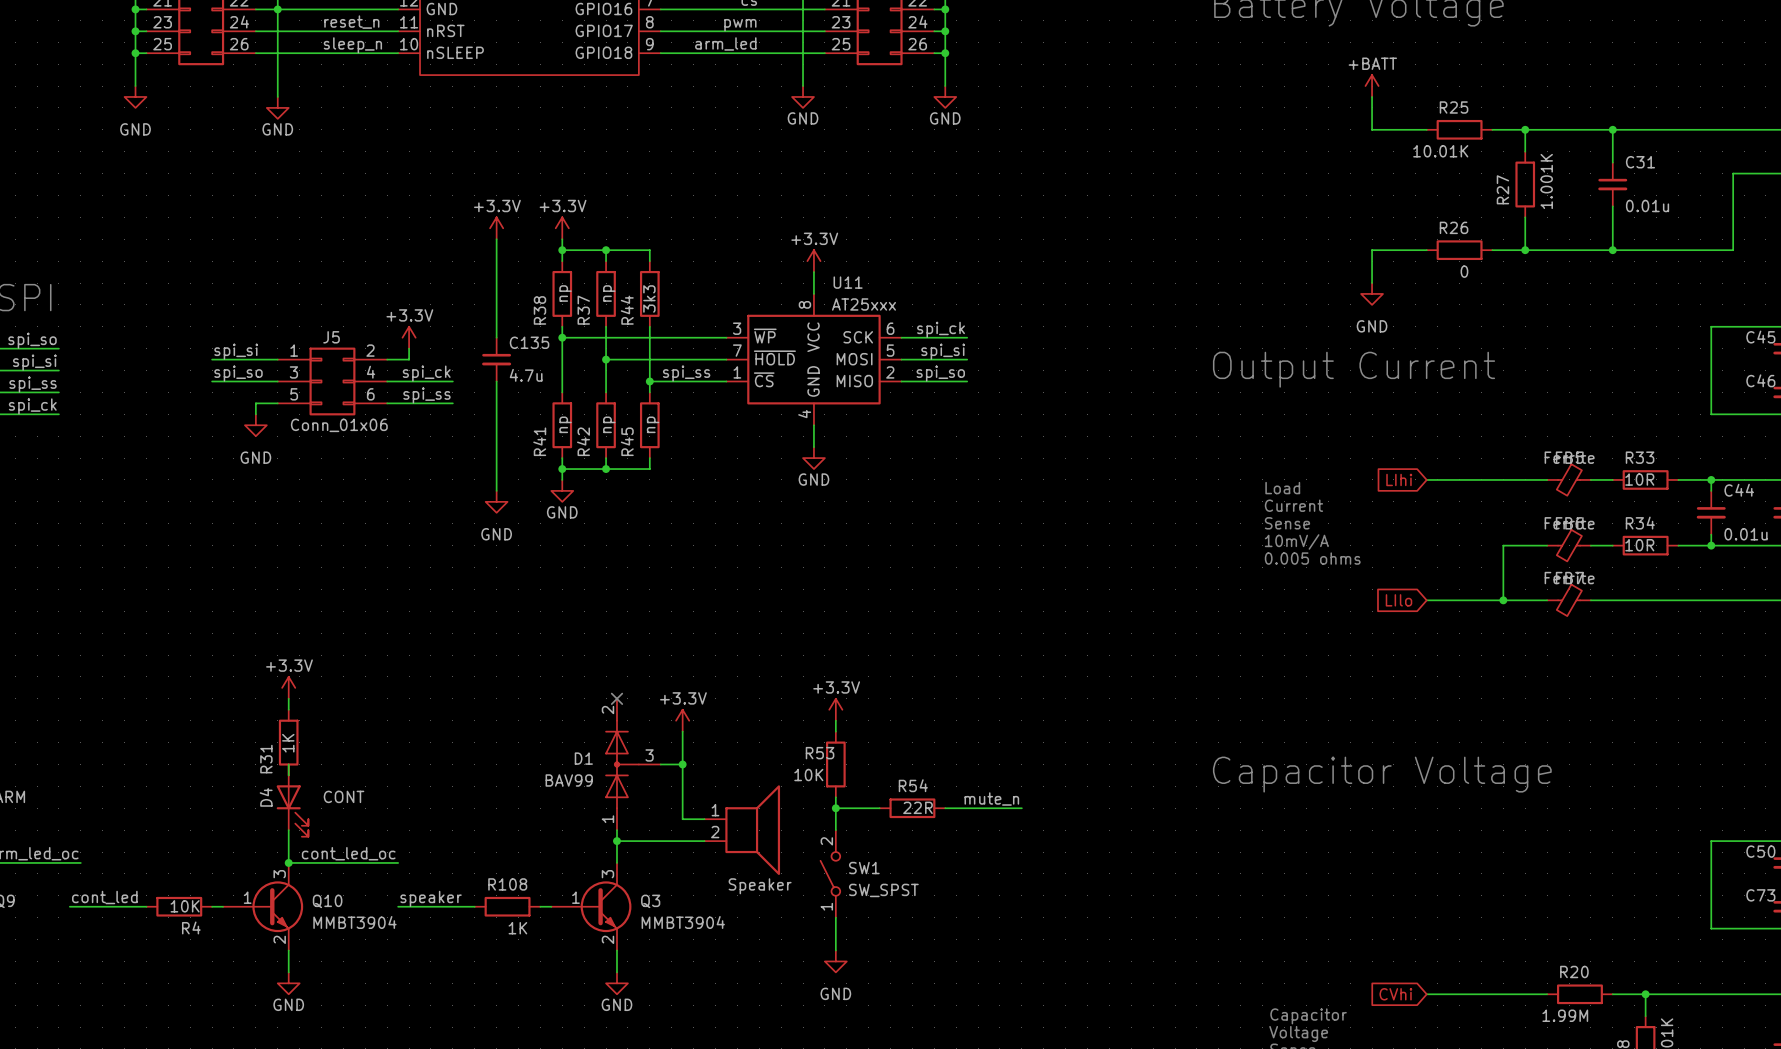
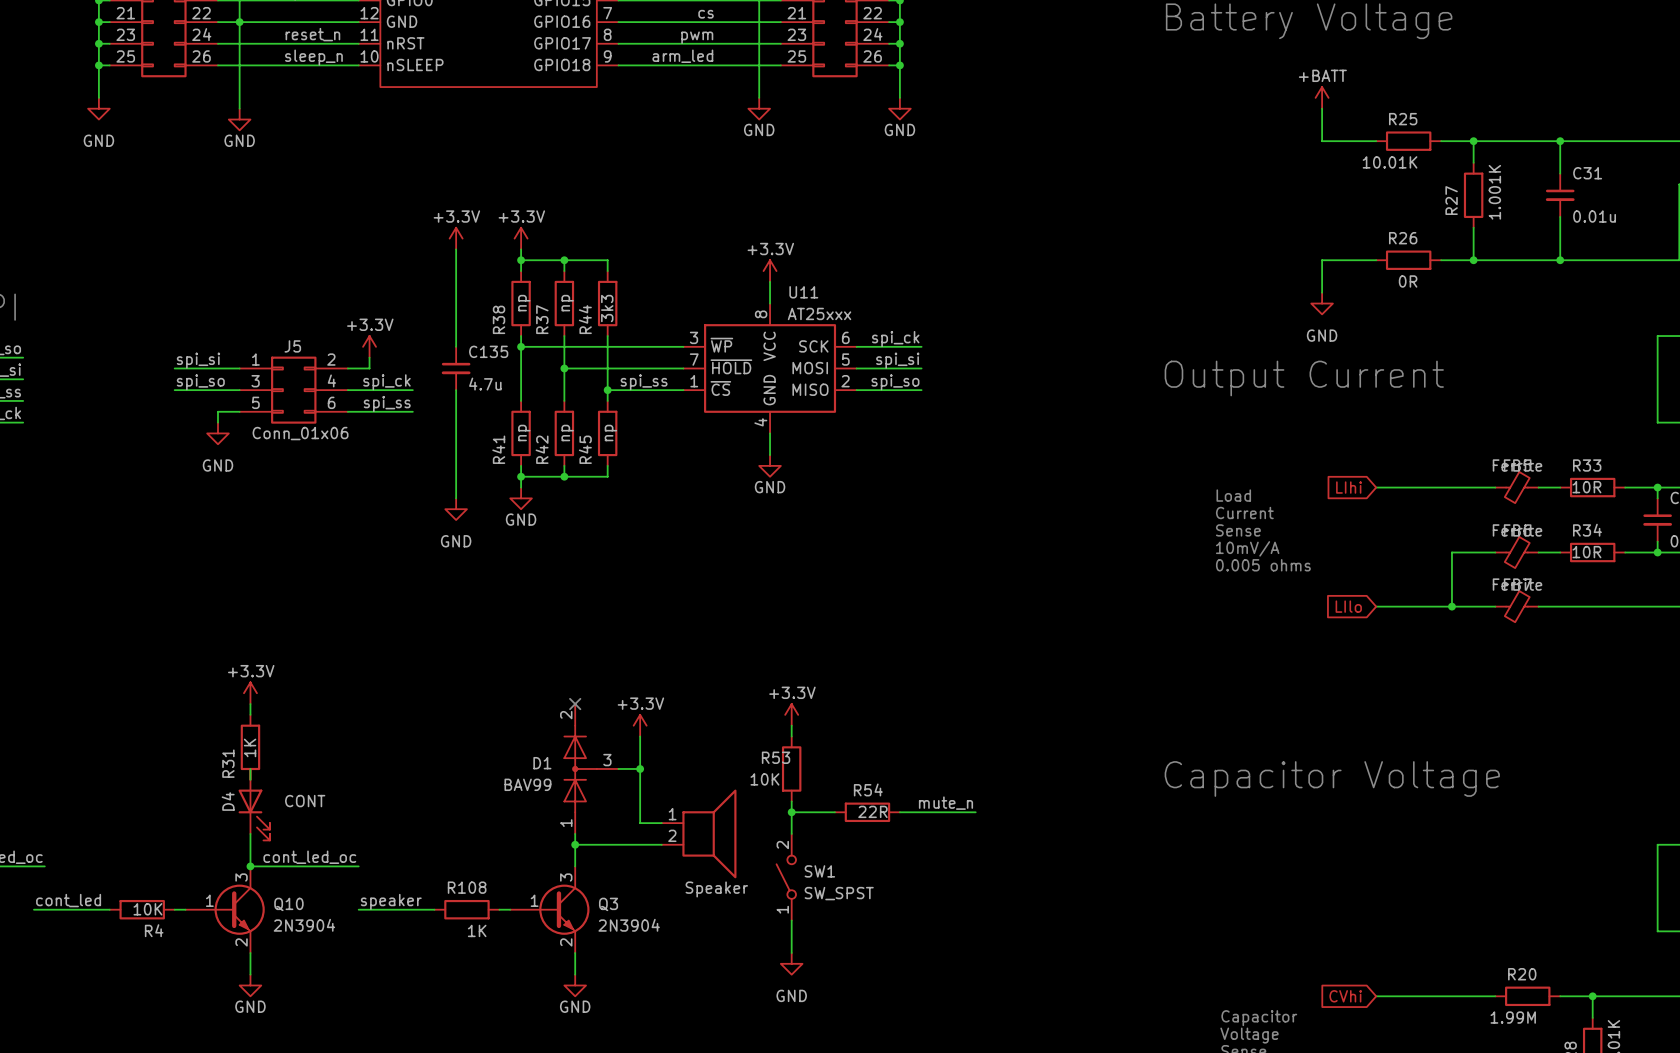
R26 value: 0 (1464, 271) -> 0R (1408, 281)
Q10 value: MMBT3904 (354, 922) -> 2N3904 (304, 925)
Q3 value: MMBT3904 (683, 922) -> 2N3904 (629, 925)

